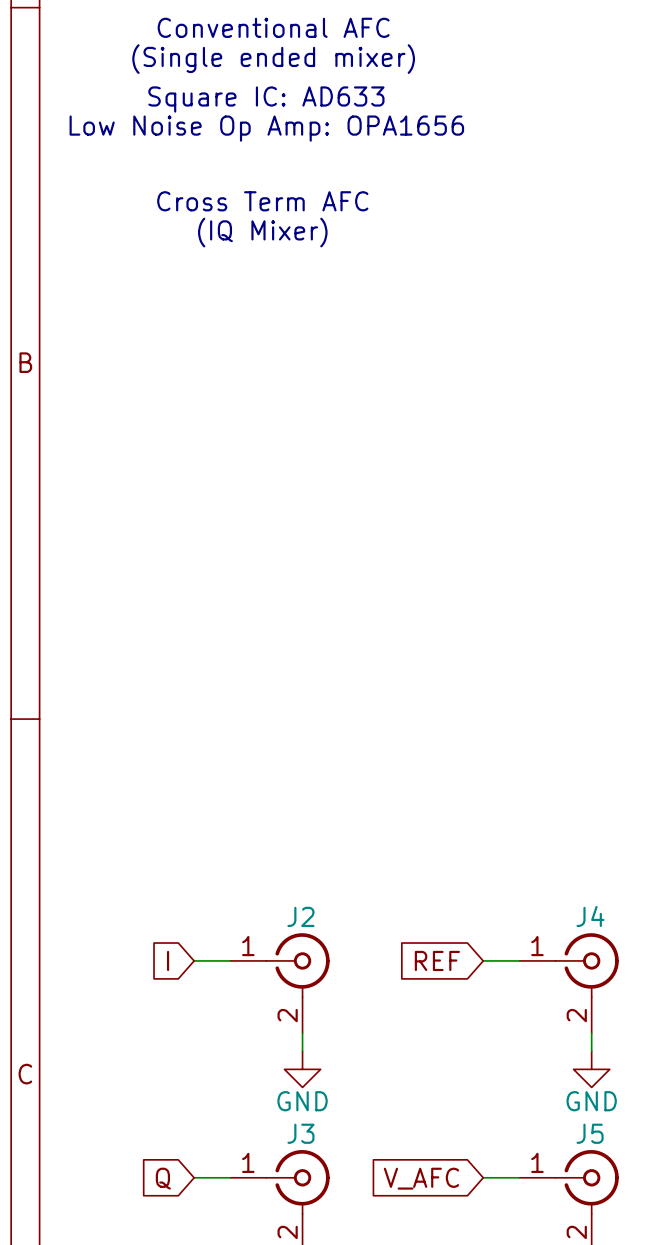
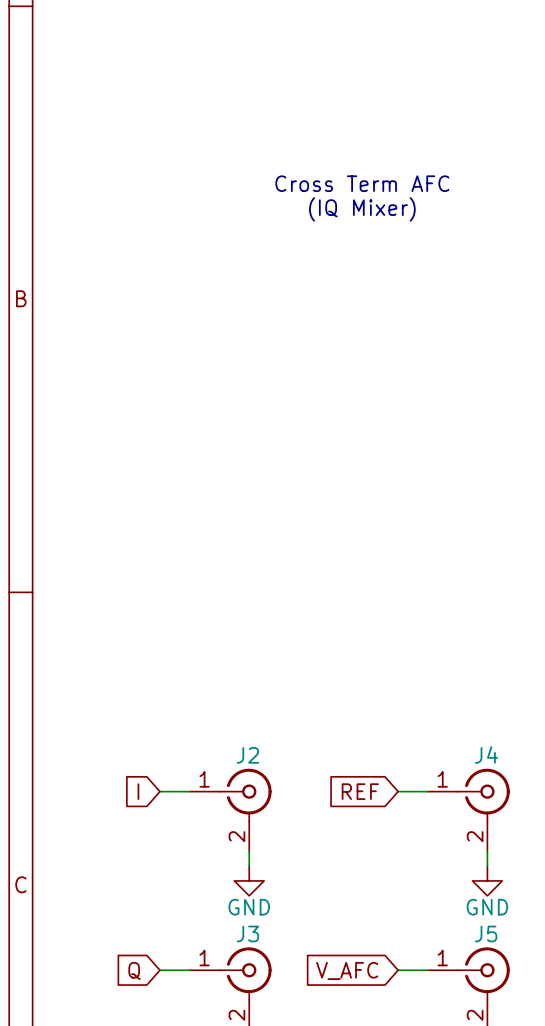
text: Conventional AFC (273, 27) -> none
text: (Single ended mixer) (273, 59) -> none
text: Square IC: AD633 (266, 99) -> none
text: Low Noise Op Amp: OPA1656 (266, 128) -> none
text position: Cross Term AFC (262, 201) -> Cross Term AFC (362, 183)
text position: (IQ Mixer) (262, 232) -> (IQ Mixer) (362, 209)

